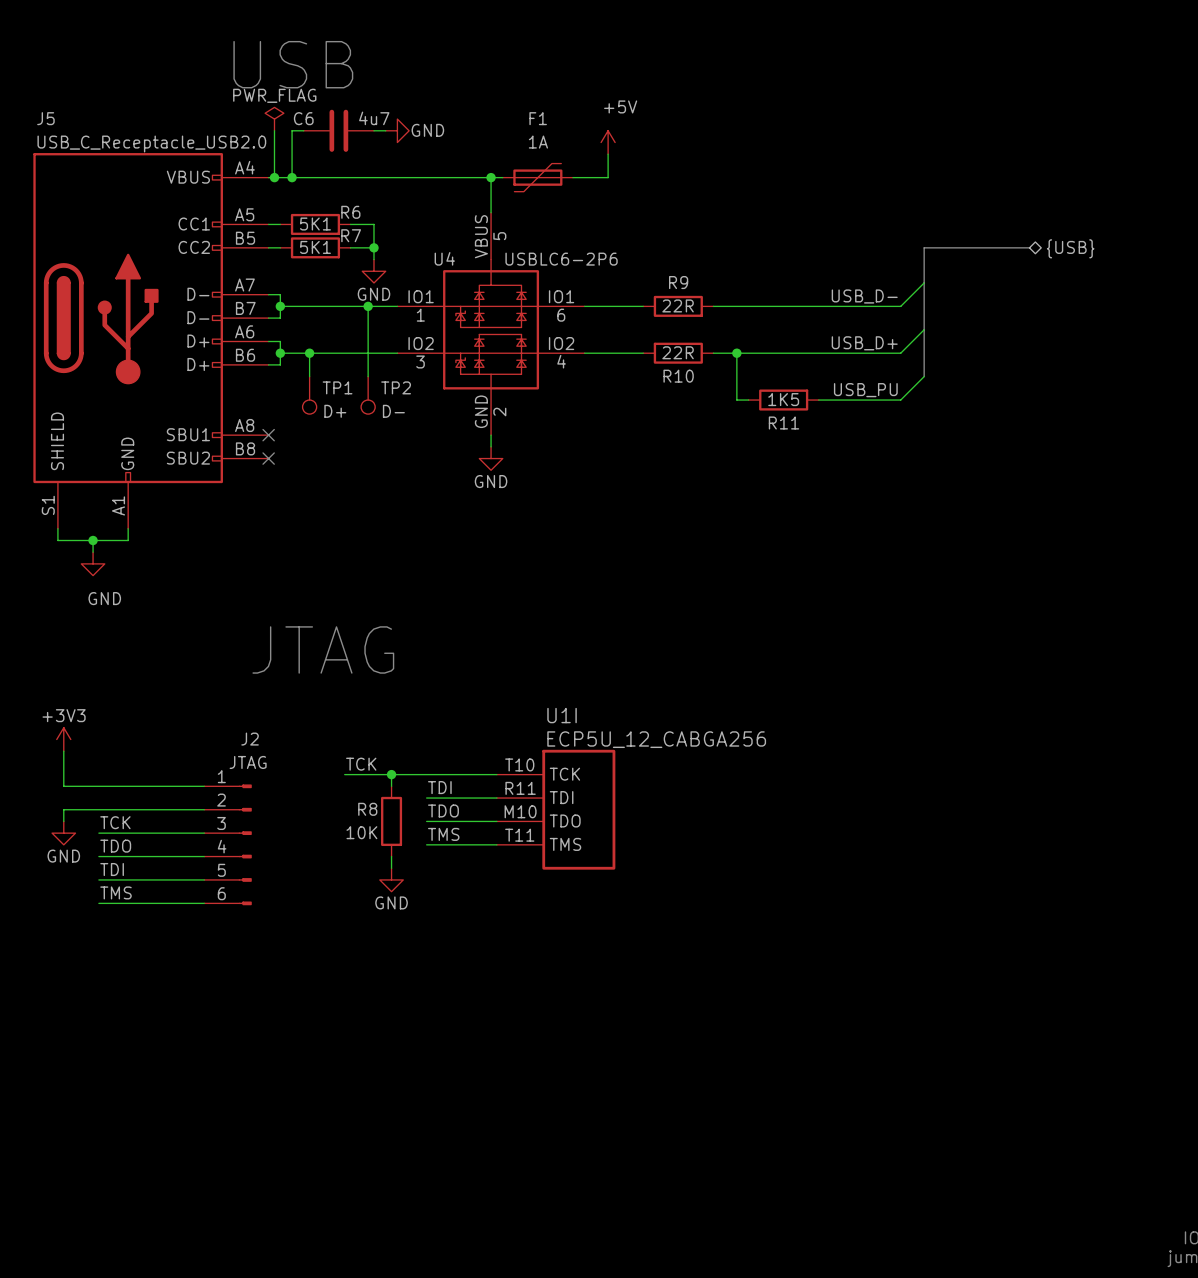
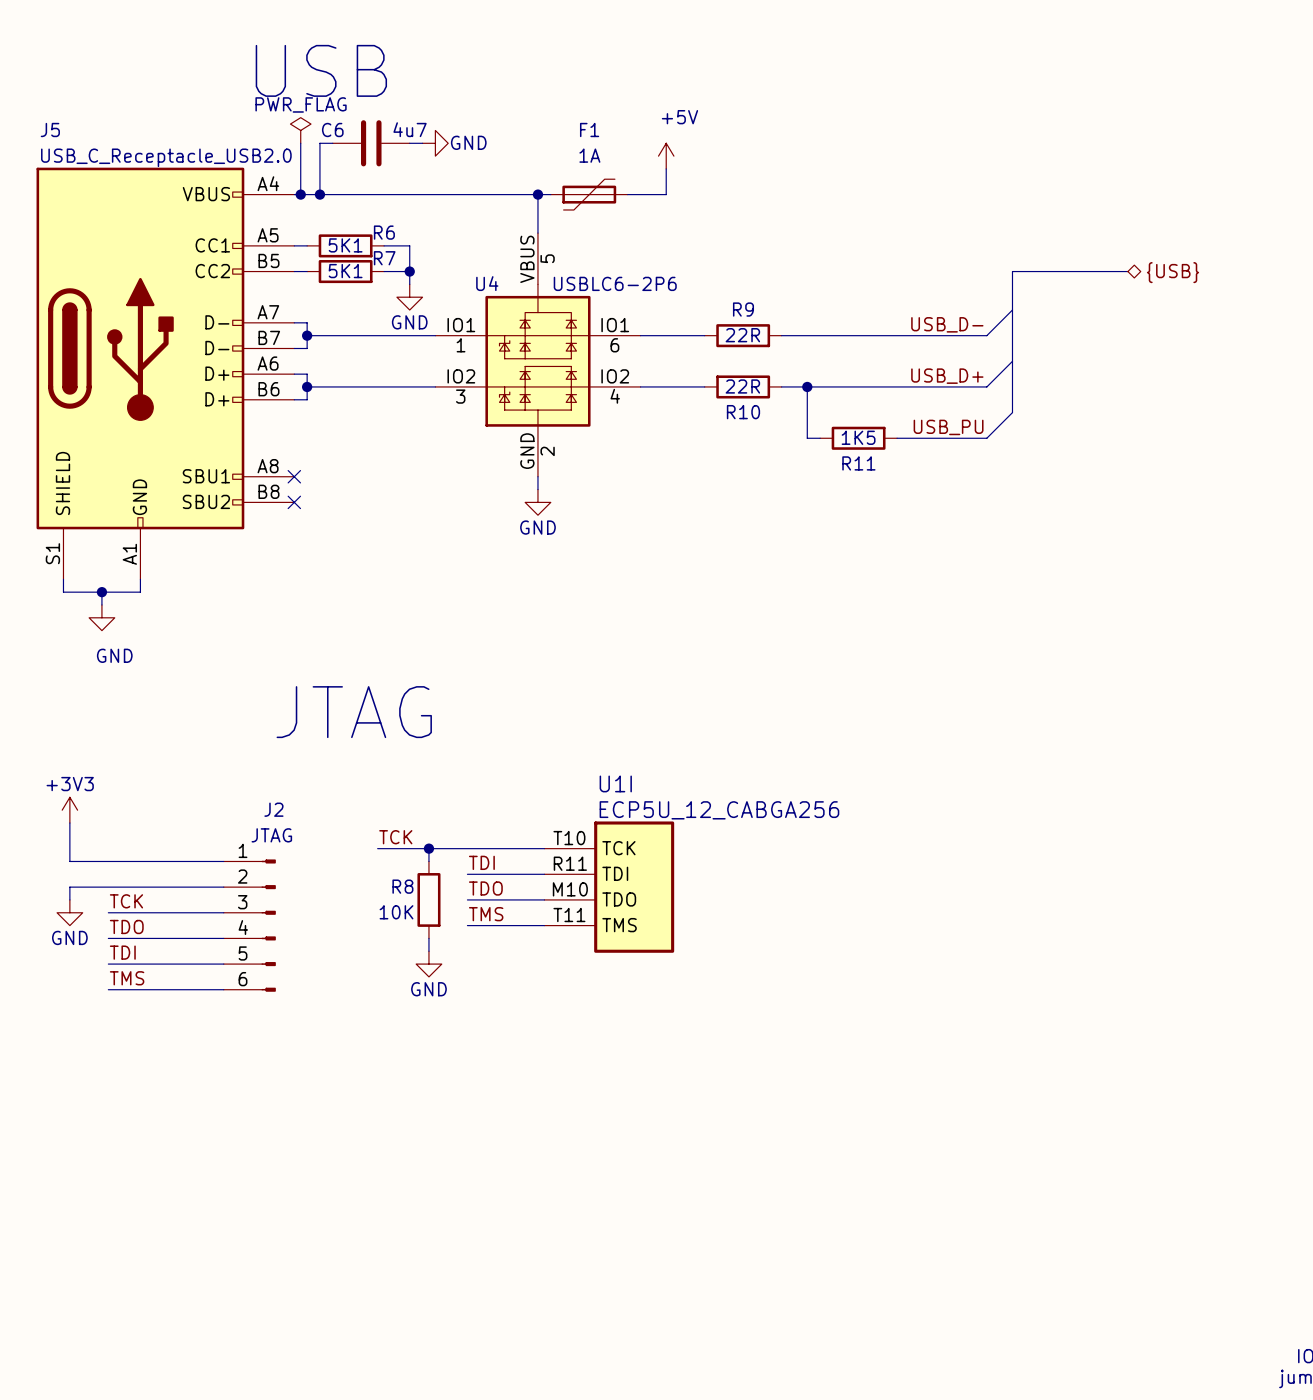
wire: (368, 306) (368, 376) -> none
junction: (368, 306) -> none
wire: (309, 353) (309, 376) -> none
junction: (309, 353) -> none
TP1: D+ (309, 395) -> none
TP2: D- (368, 395) -> none

